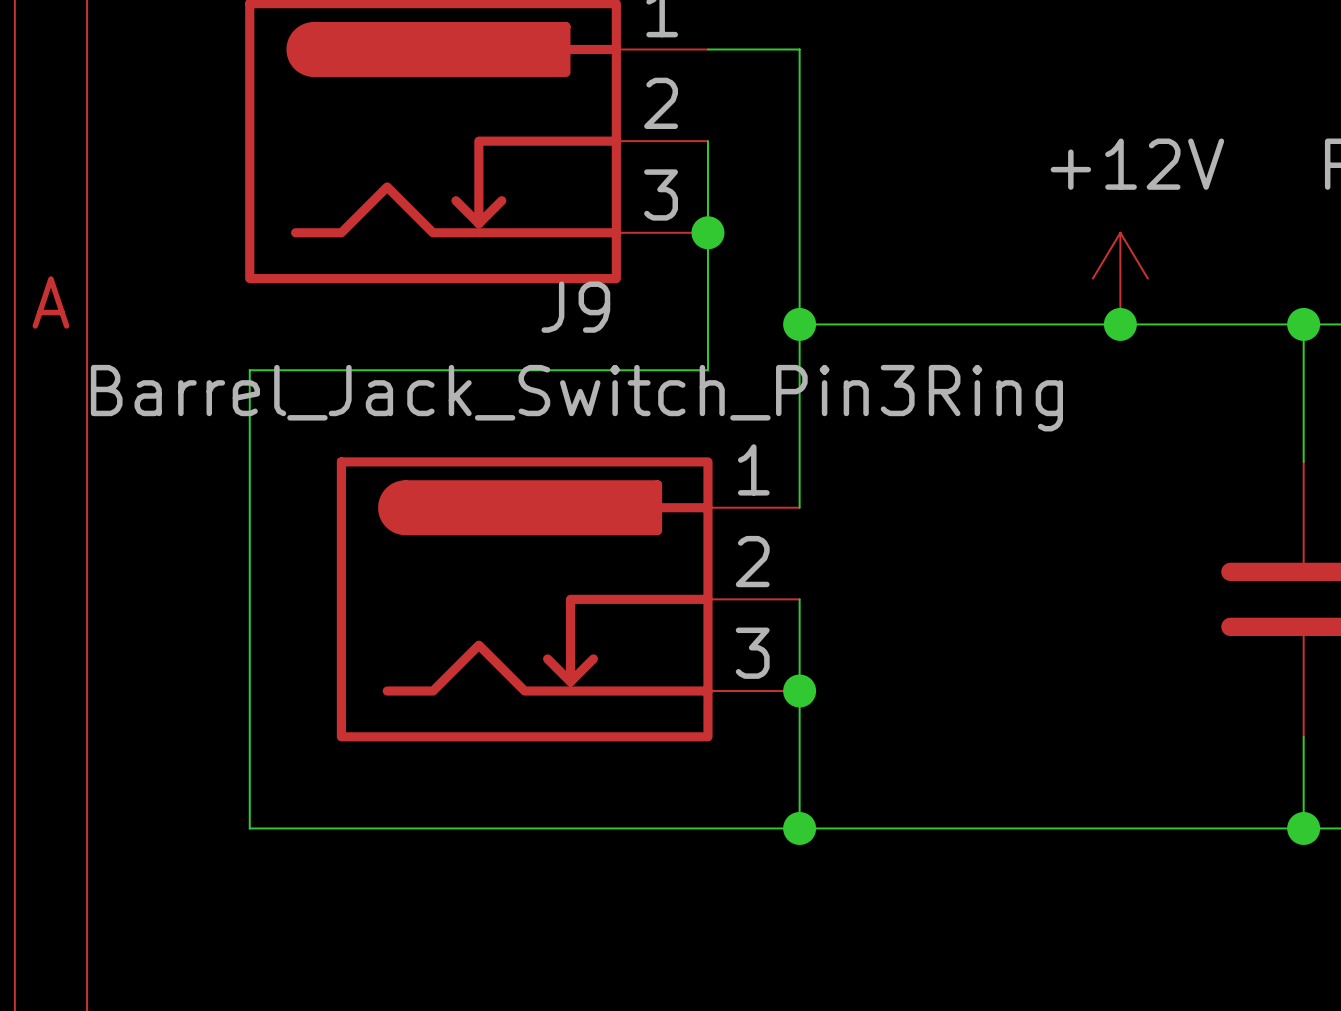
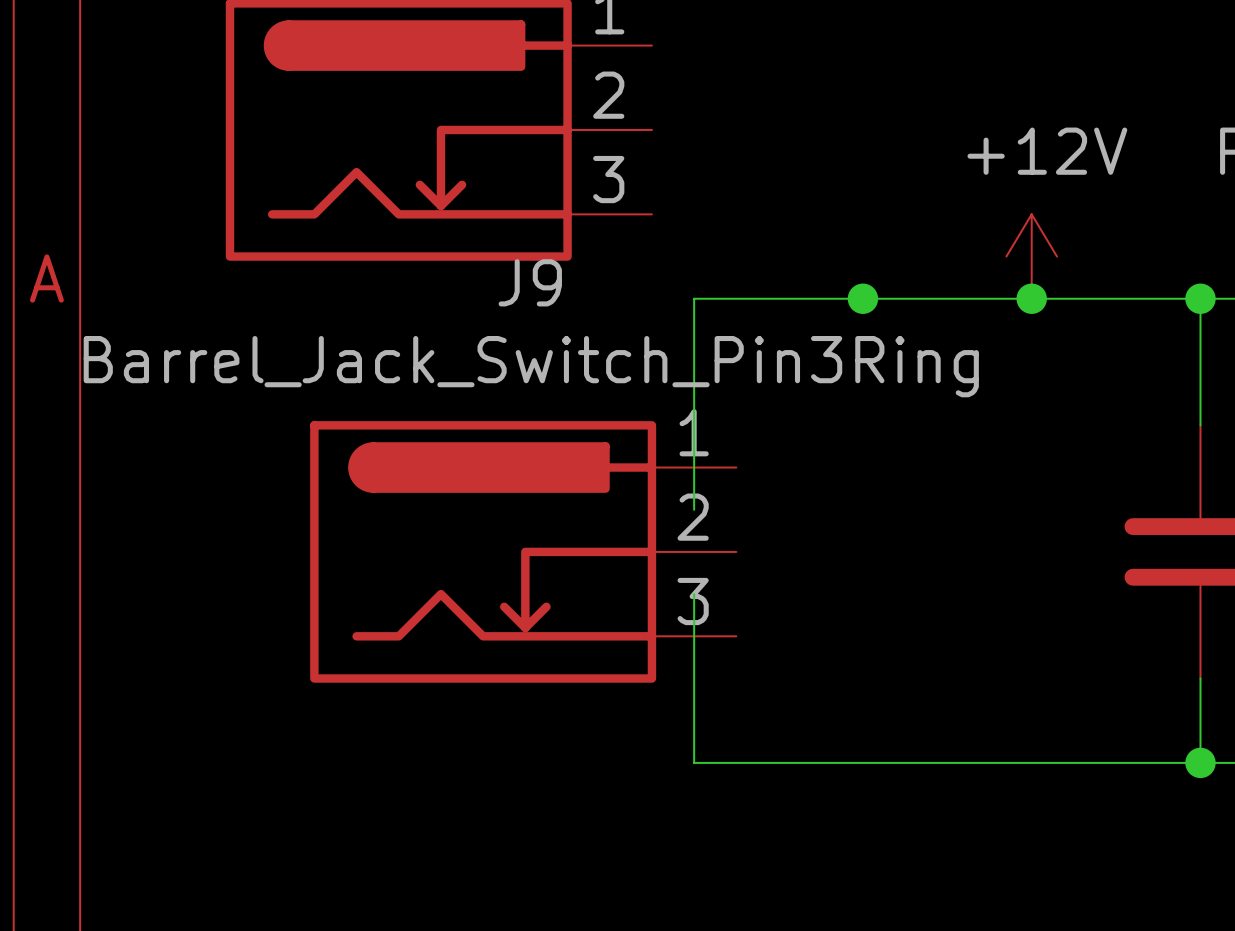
wire: (707, 49) (799, 49) (799, 507) -> none
wire: (707, 141) (707, 370) (249, 370) (249, 828) (753, 828) -> (694, 594) (694, 762)
junction: (707, 232) -> none
wire: none -> (736, 298) (694, 298) (694, 509)
junction: (799, 324) -> none
junction: none -> (862, 298)
wire: (799, 599) (799, 828) -> none
junction: (799, 691) -> none
junction: (799, 828) -> none

